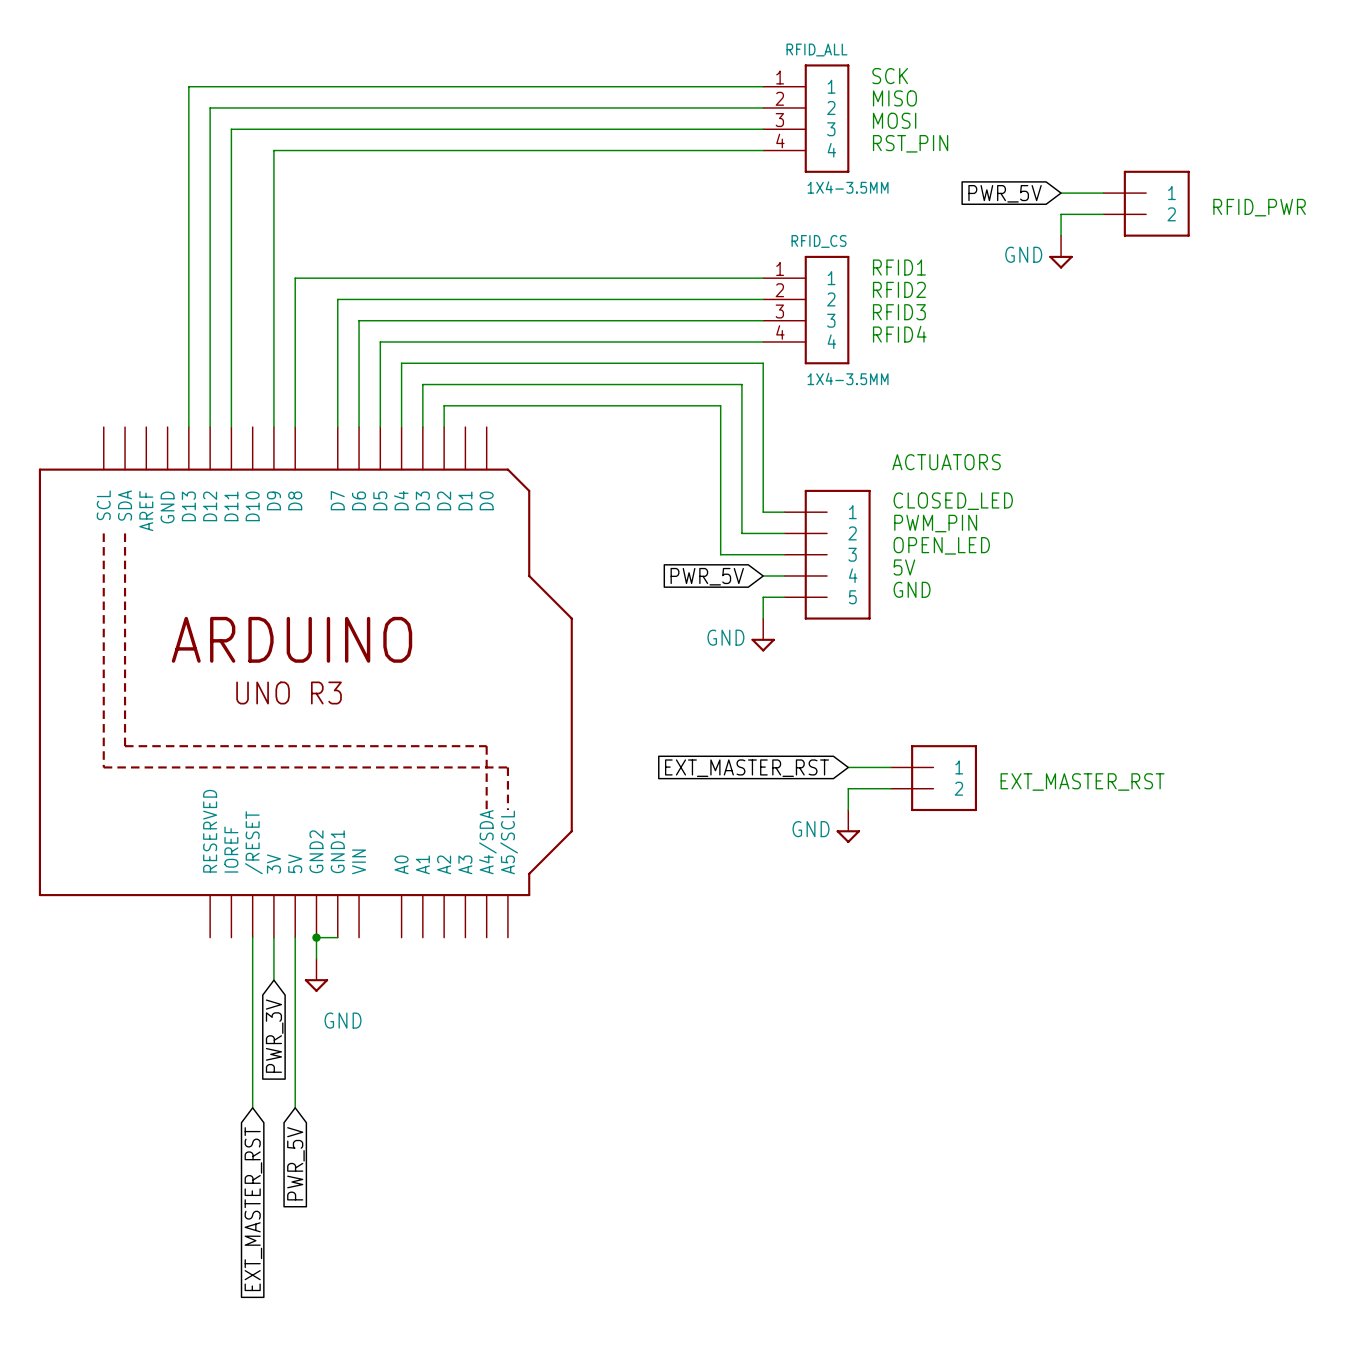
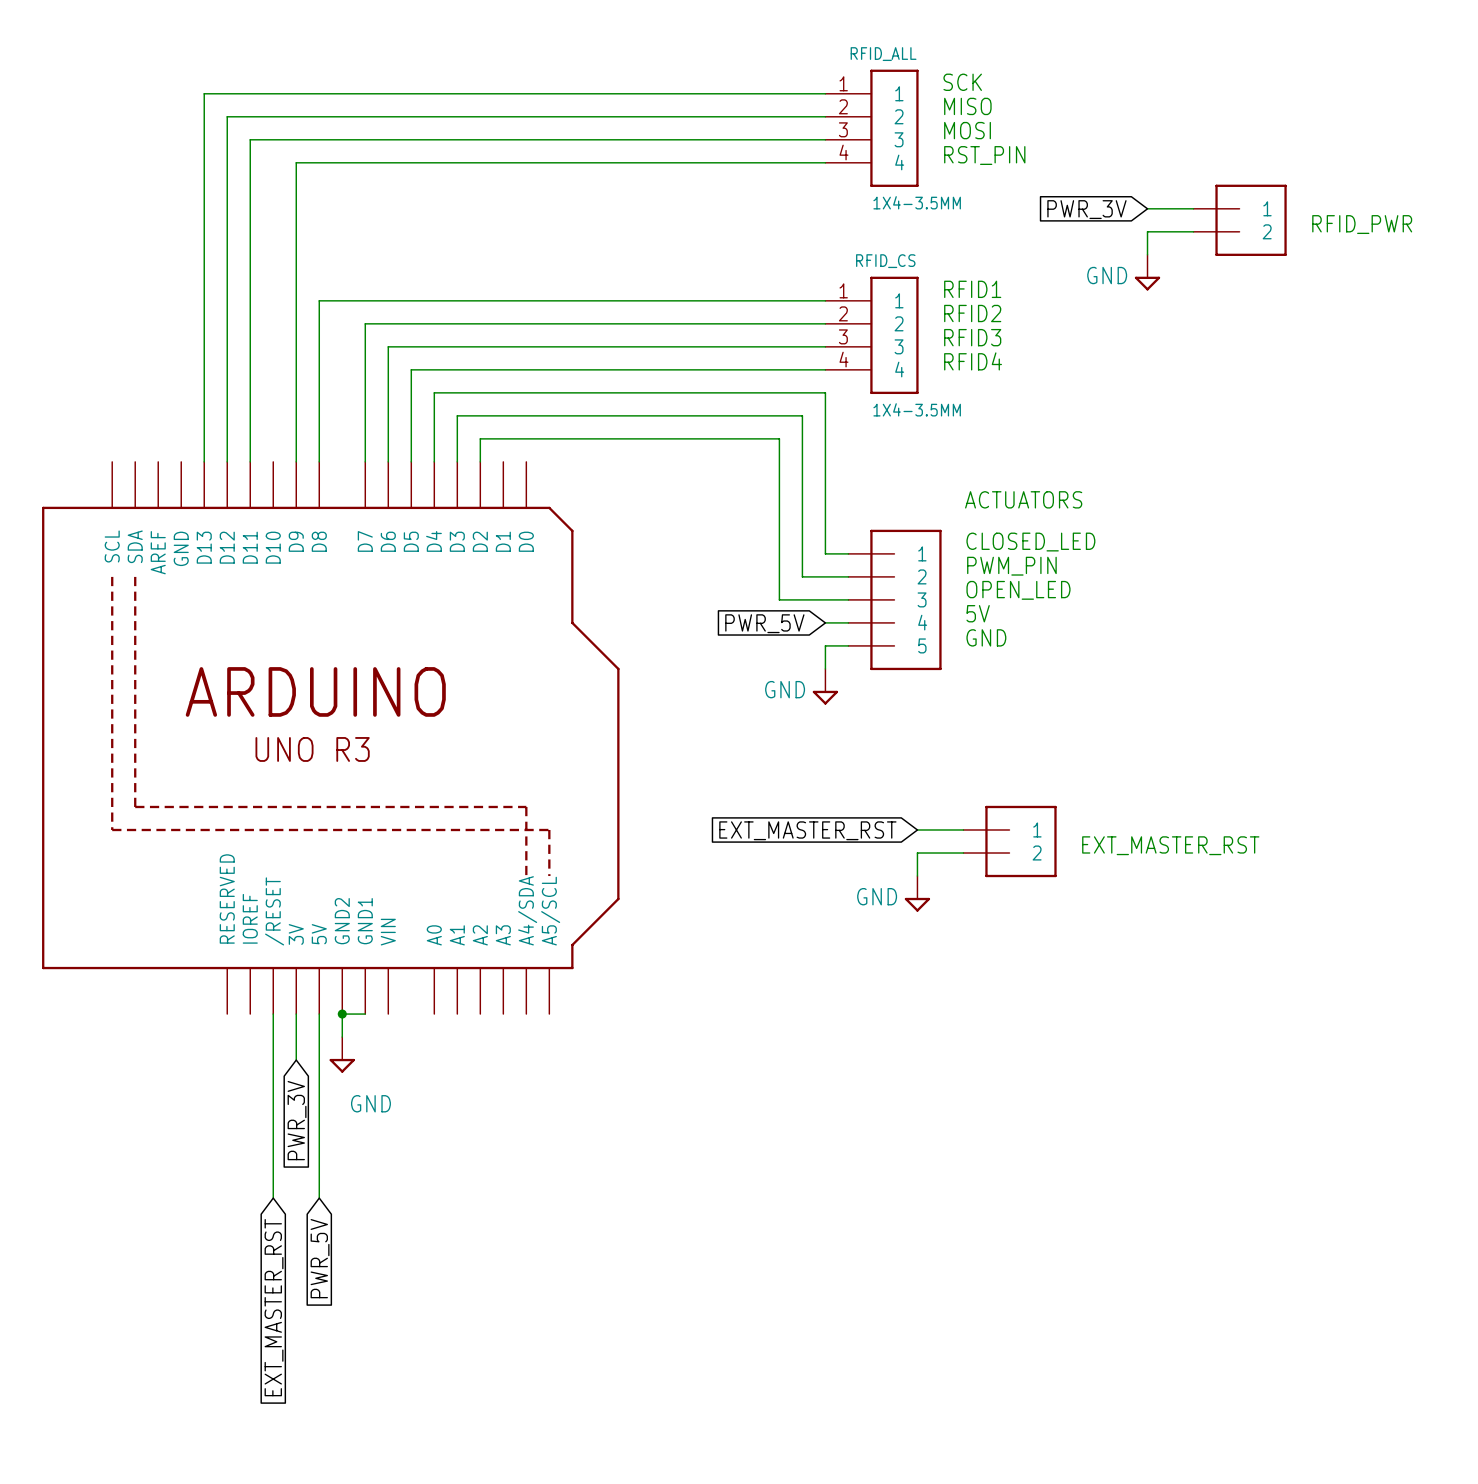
global label: PWR_5V (1005, 193) -> PWR_3V (1086, 209)

